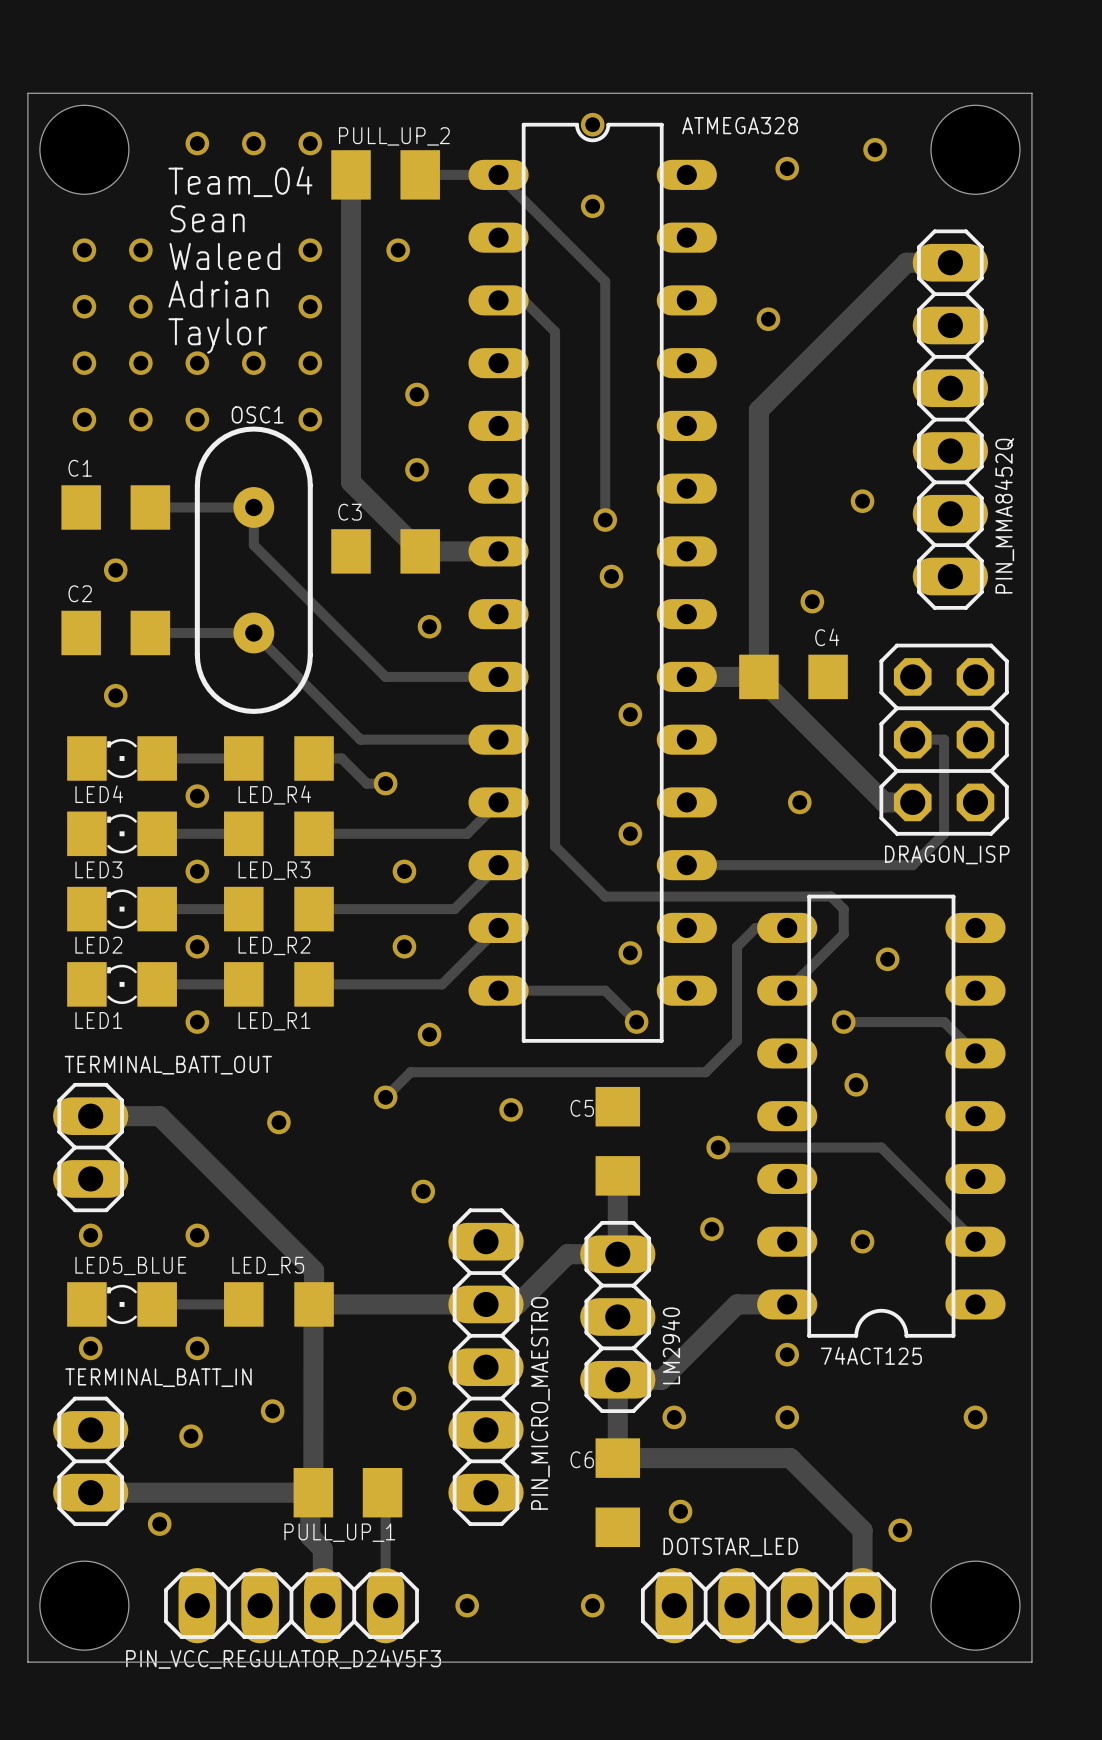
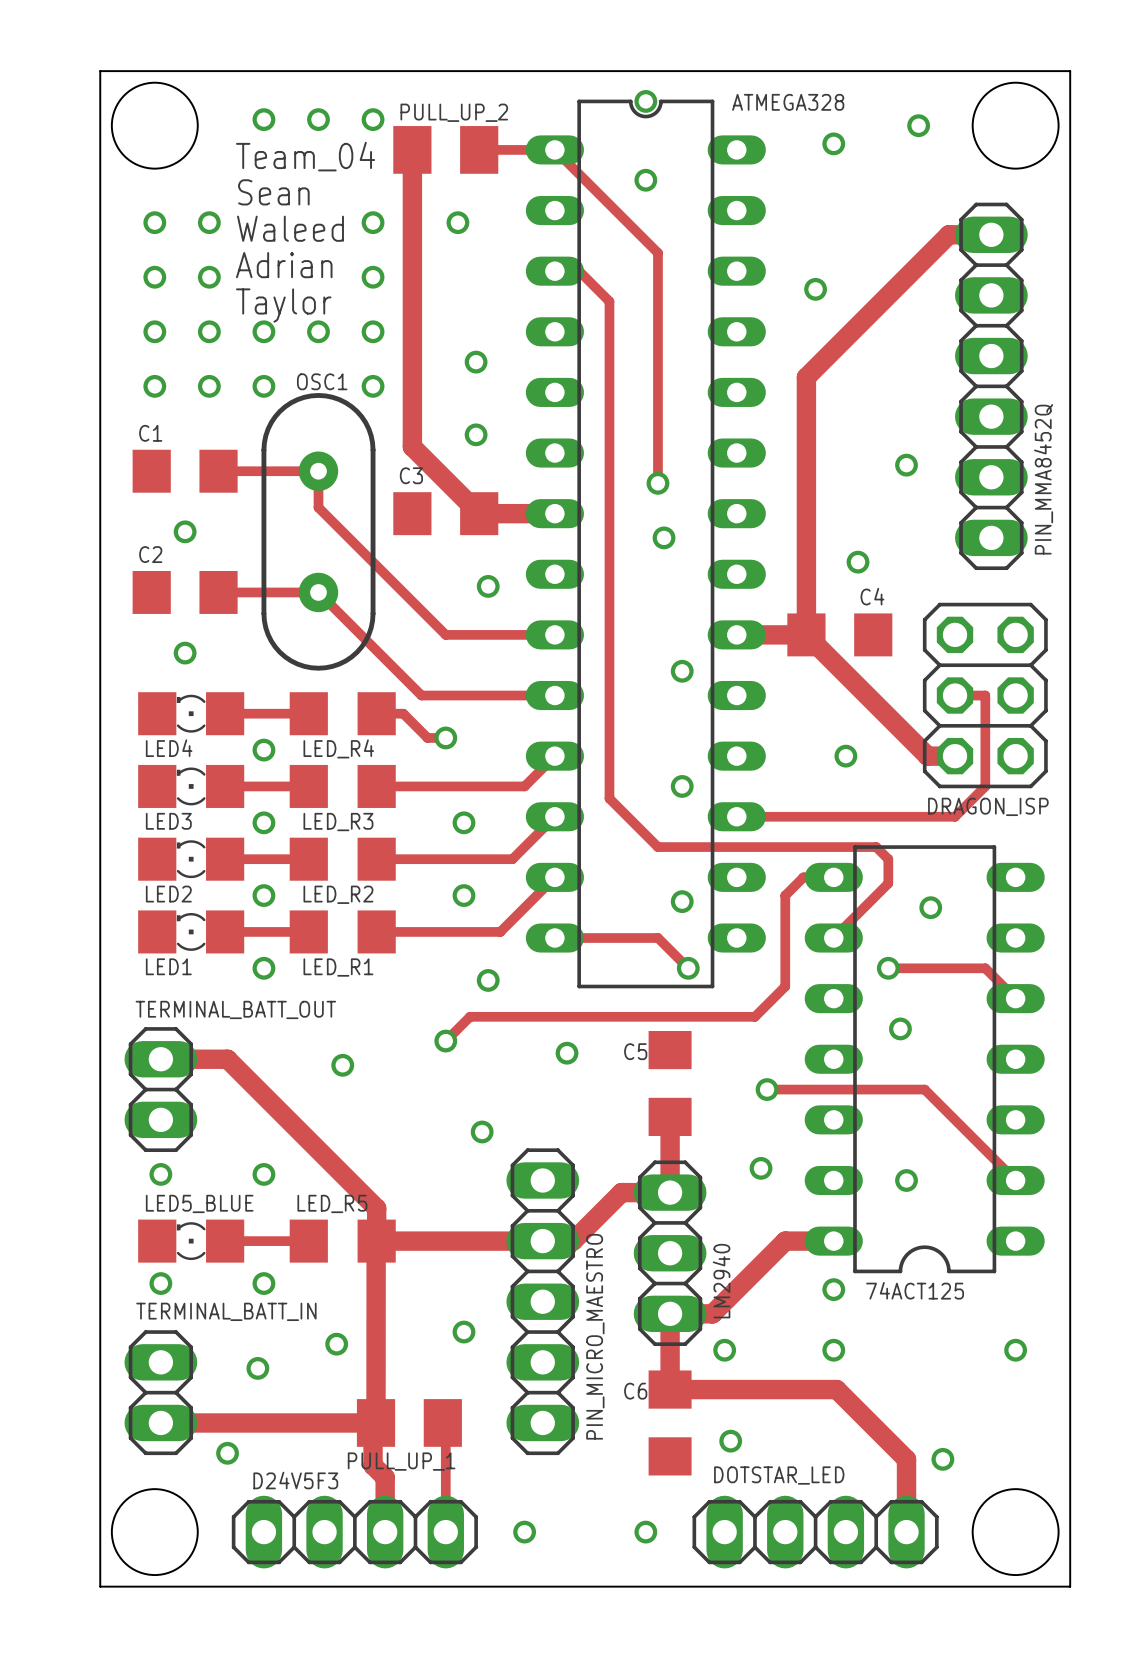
PIN_VCC_REGULATOR_D24V5F3 name: PIN_VCC_REGULATOR_D24V5F3 (283, 1659) -> D24V5F3 (295, 1480)

